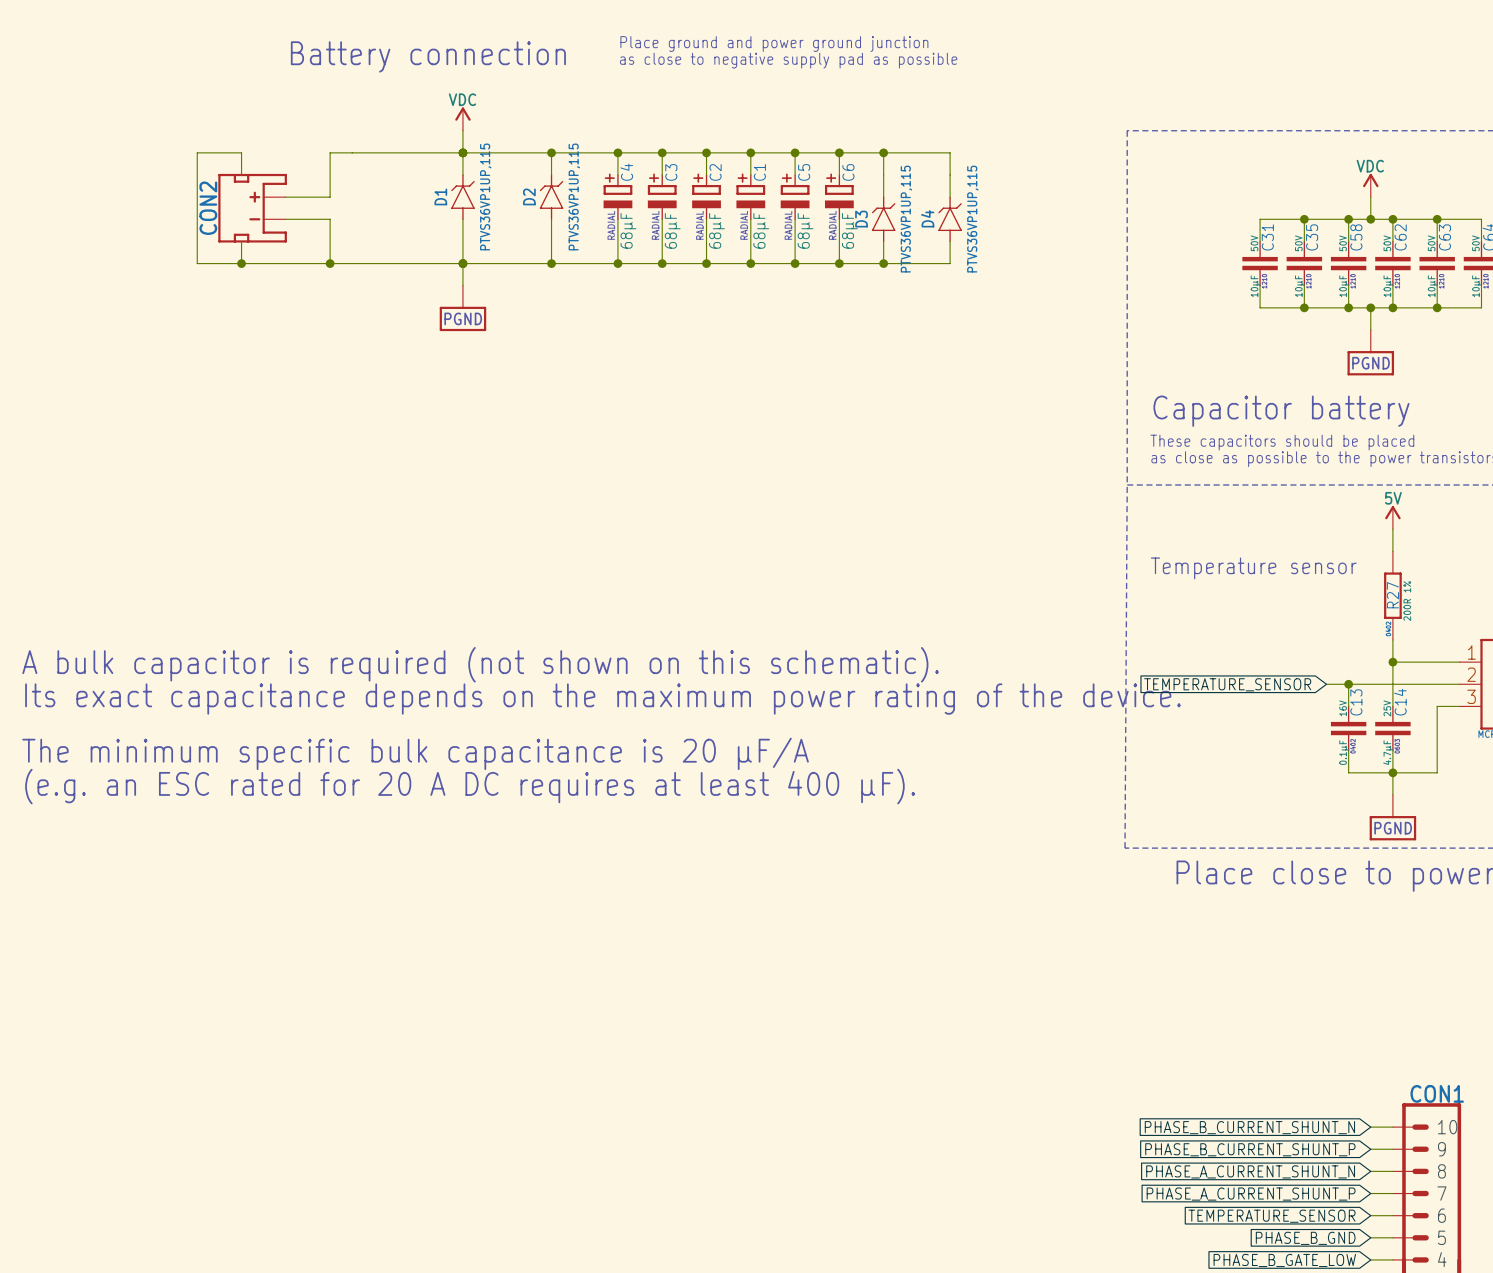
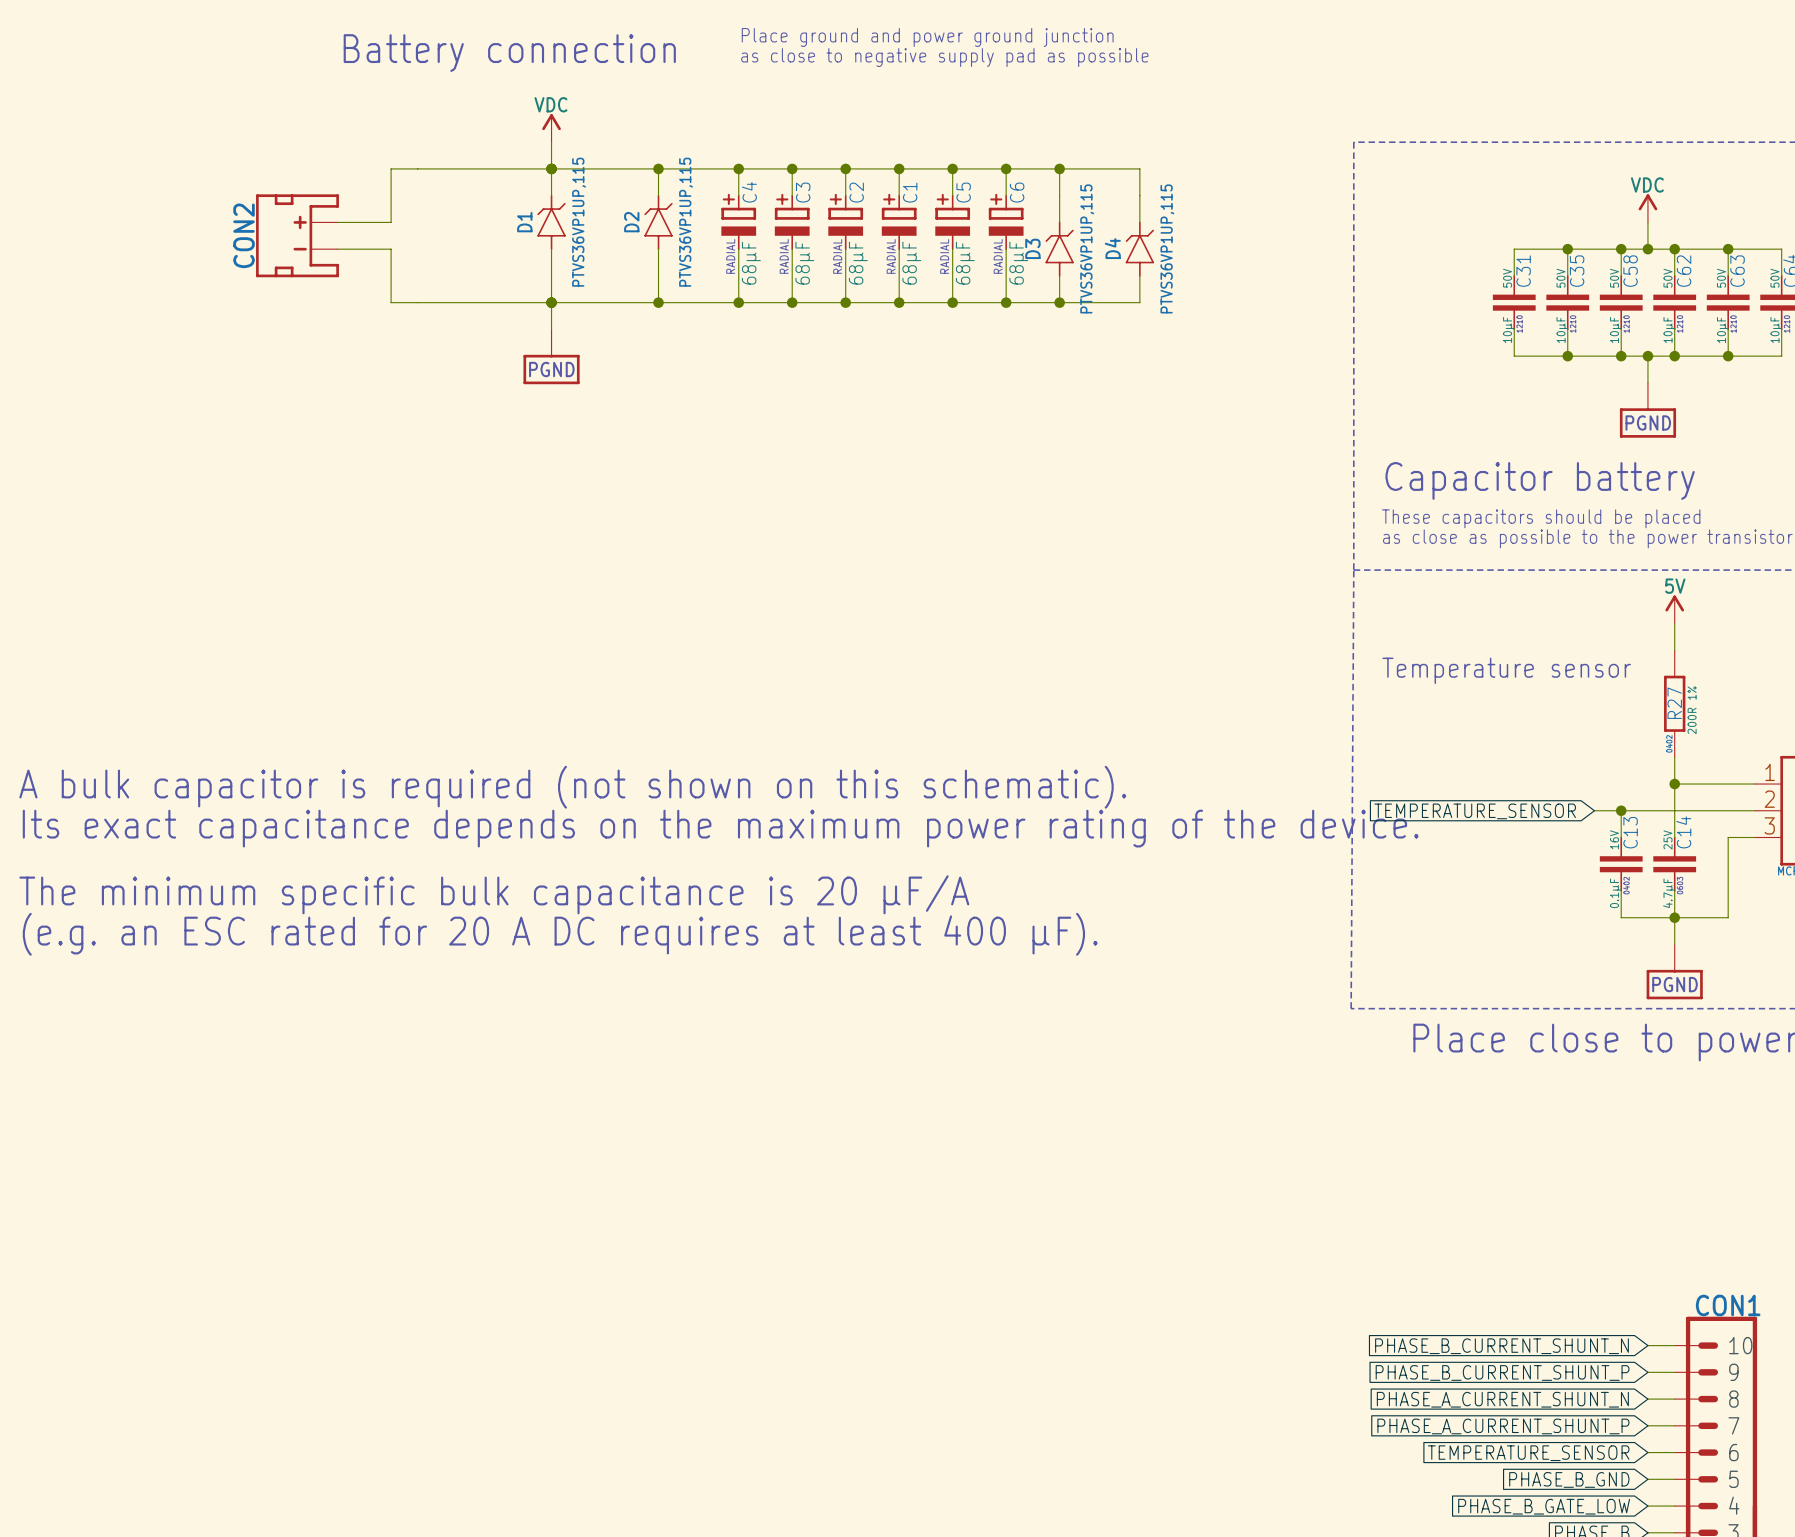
wire: (241, 175) (241, 152) (197, 152) (197, 263) (330, 263) -> none
wire: (241, 241) (241, 263) -> none
junction: (241, 263) -> none
junction: (330, 263) -> none

